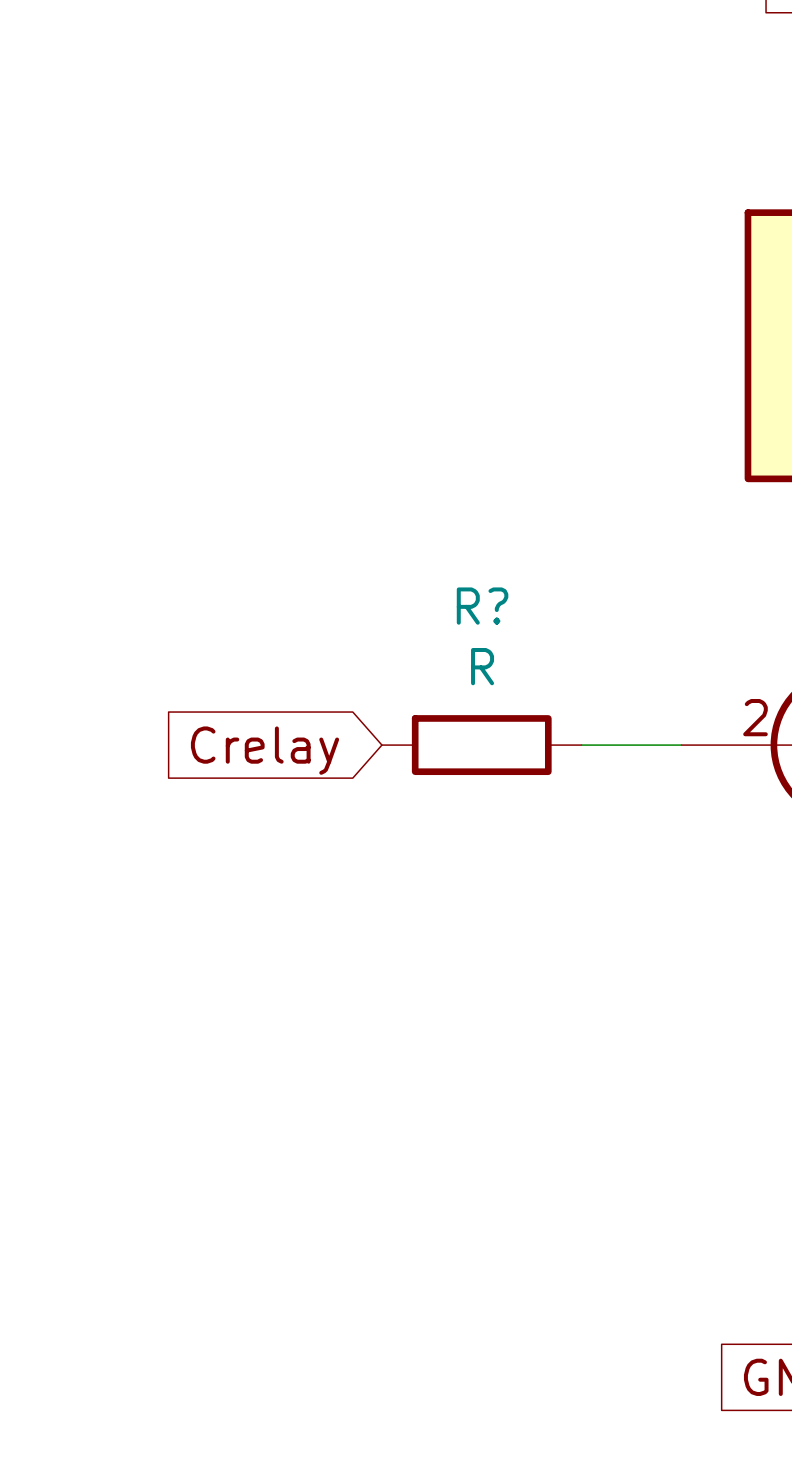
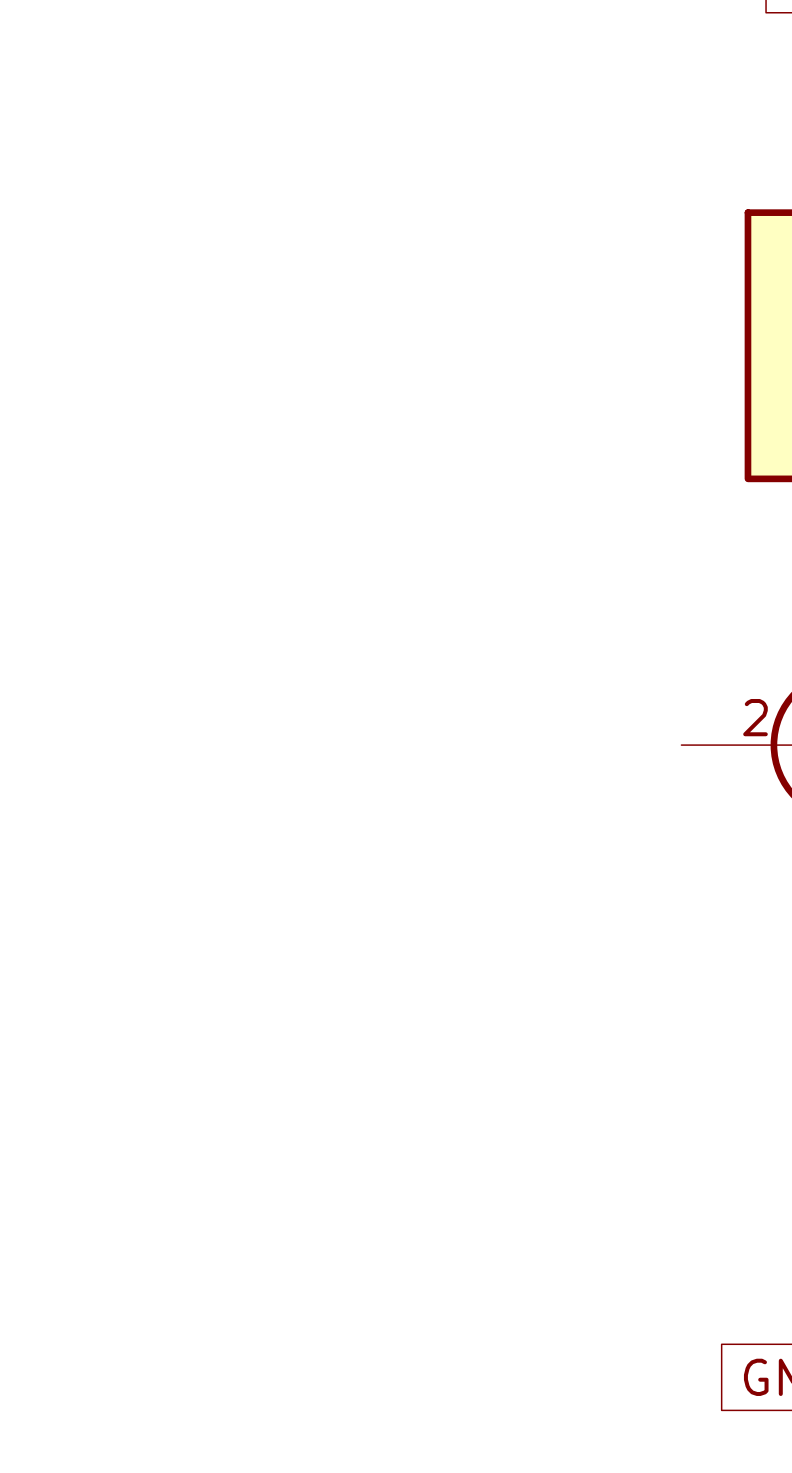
R?: R (481, 745) -> none
wire: (581, 745) (681, 745) -> none
global label: Crelay (265, 750) -> none

